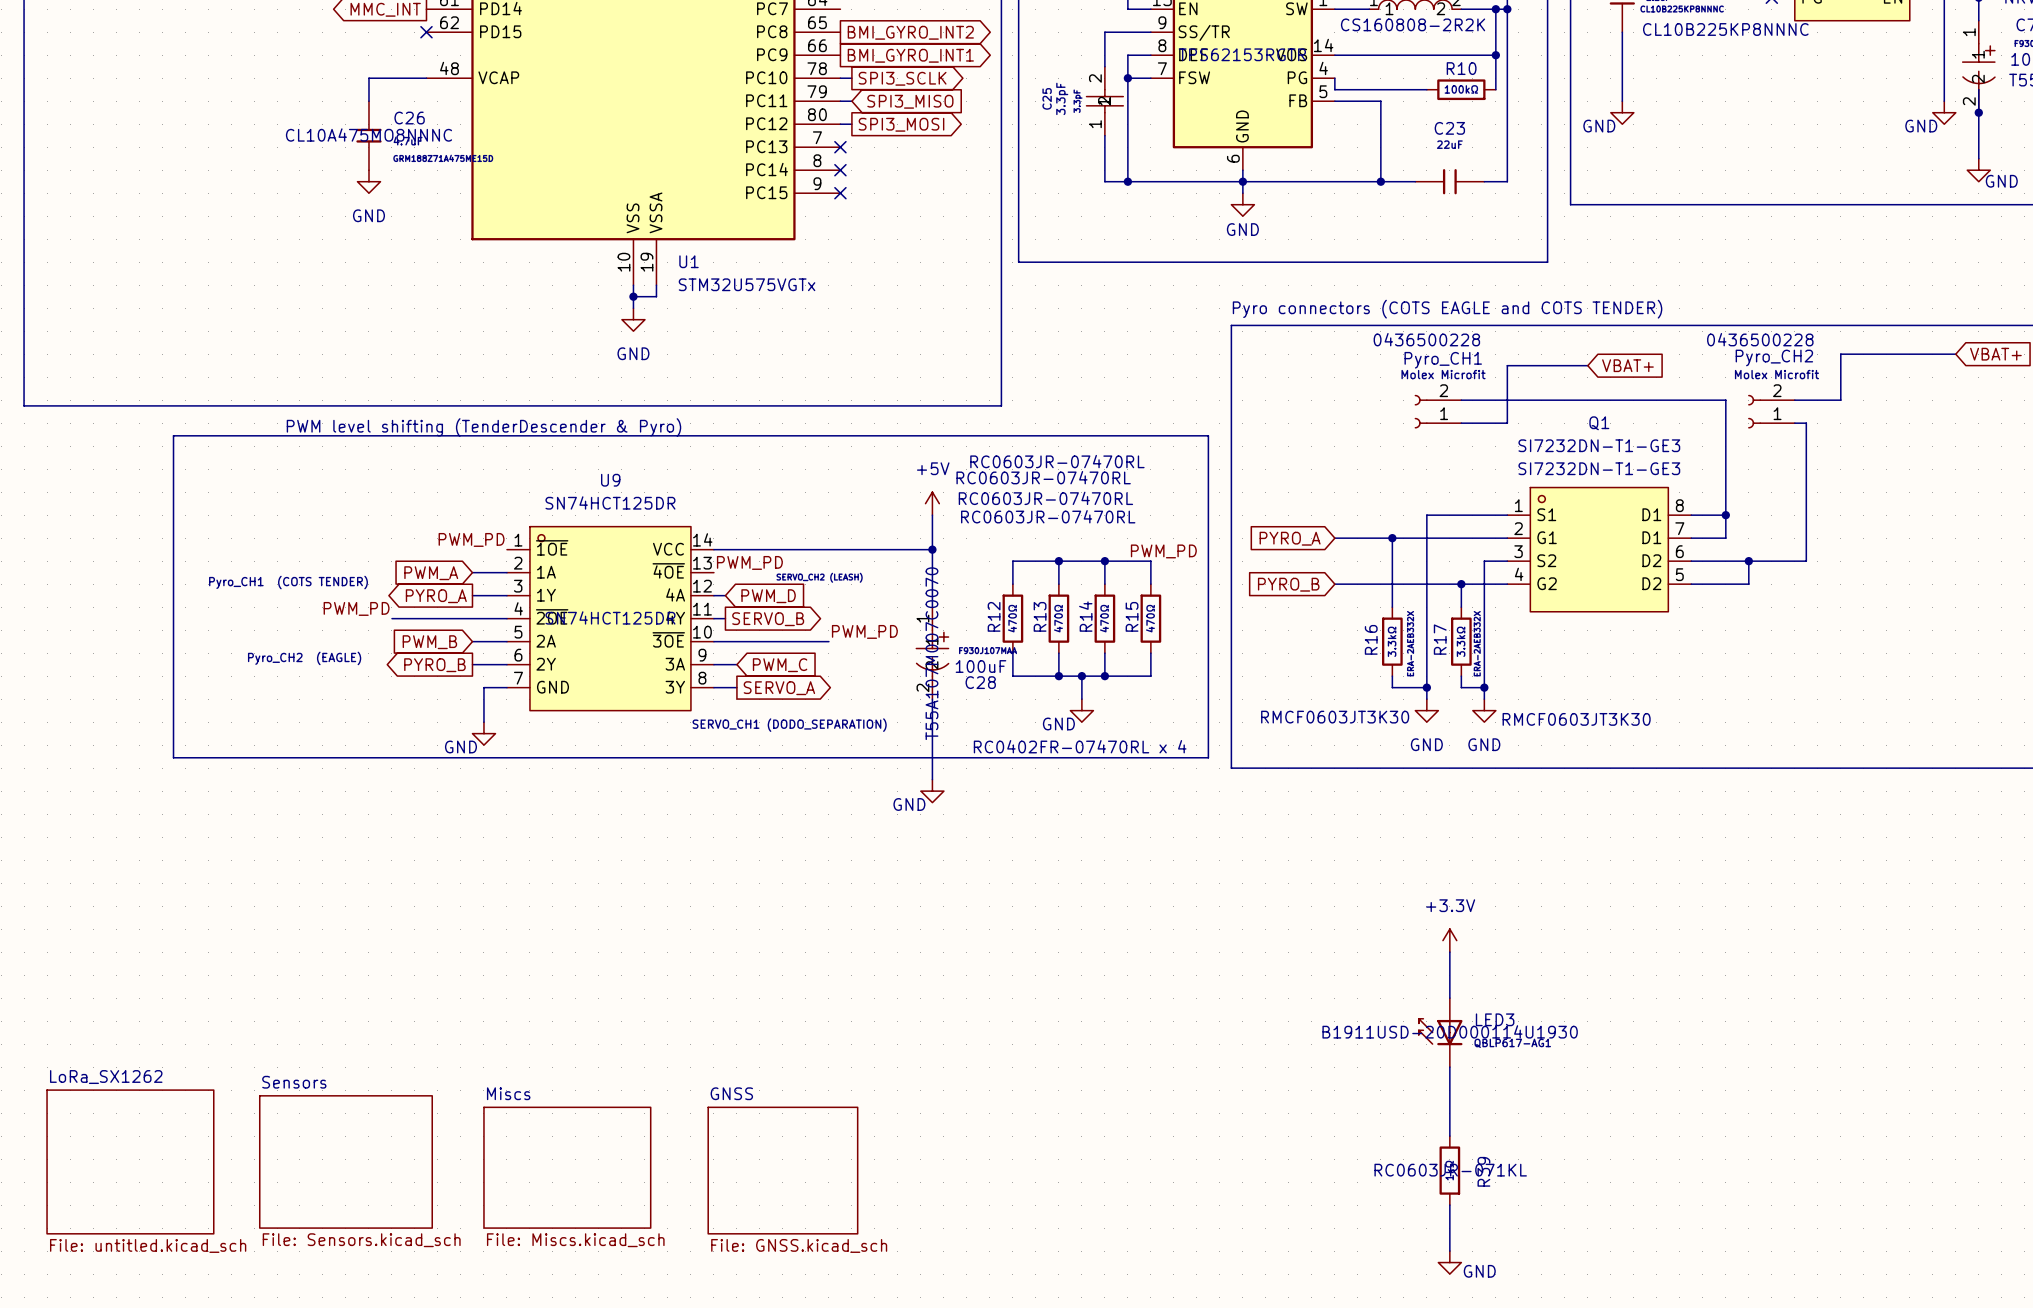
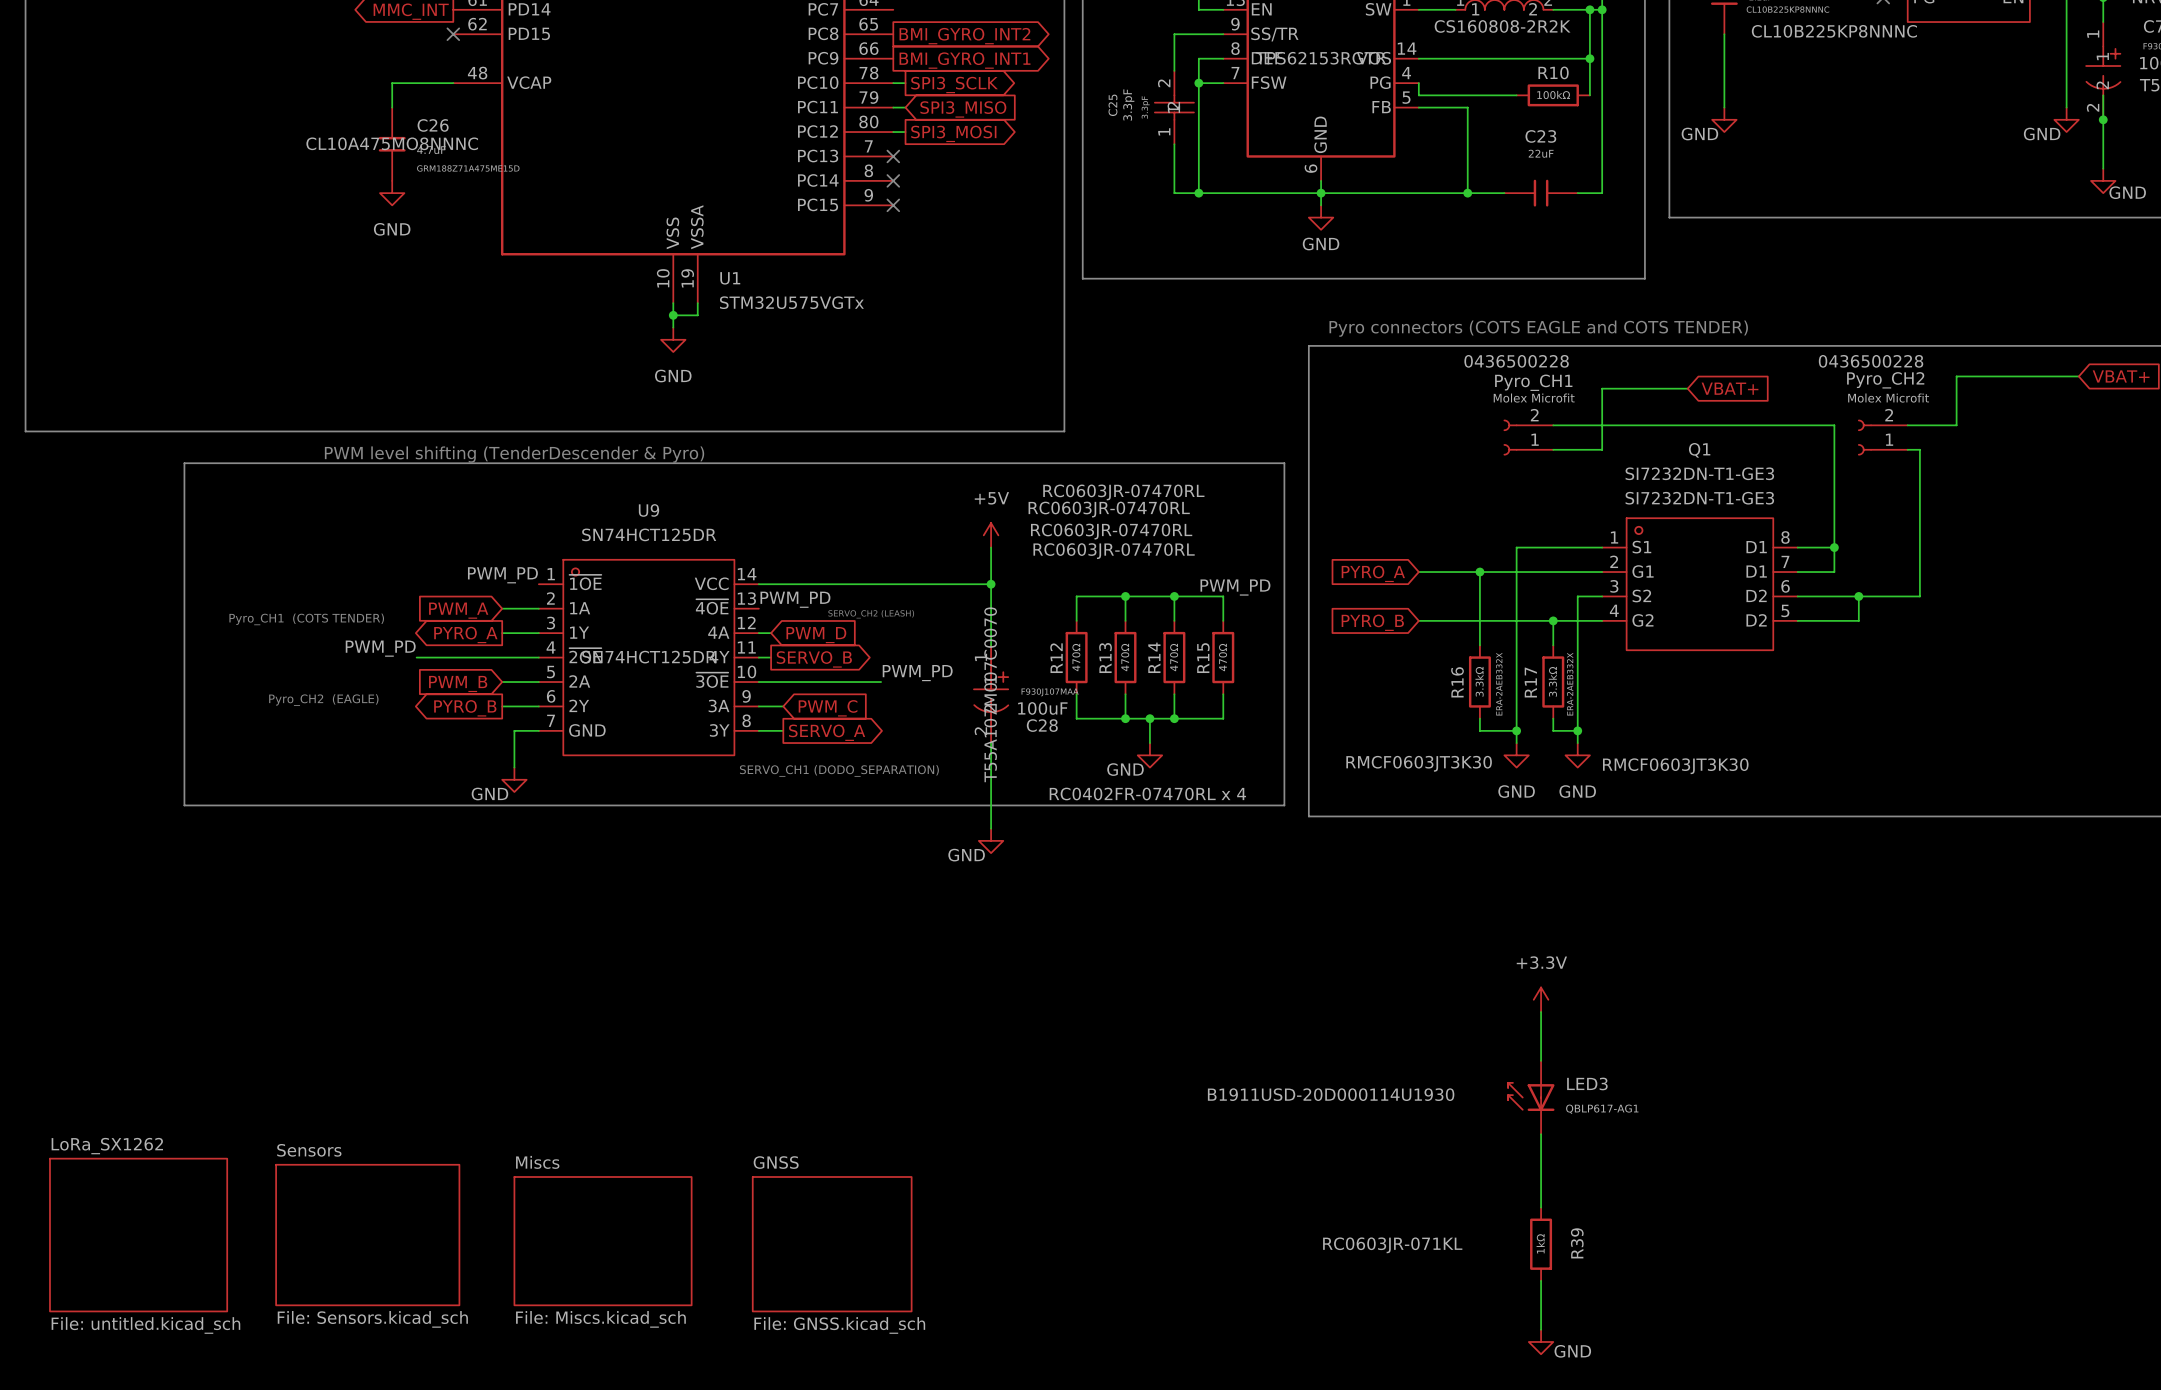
LED3 text position: B1911USD-20D000114U1930 (1450, 1031) -> B1911USD-20D000114U1930 (1331, 1094)
R39 text position: RC0603JR-071KL (1450, 1170) -> RC0603JR-071KL (1392, 1245)

